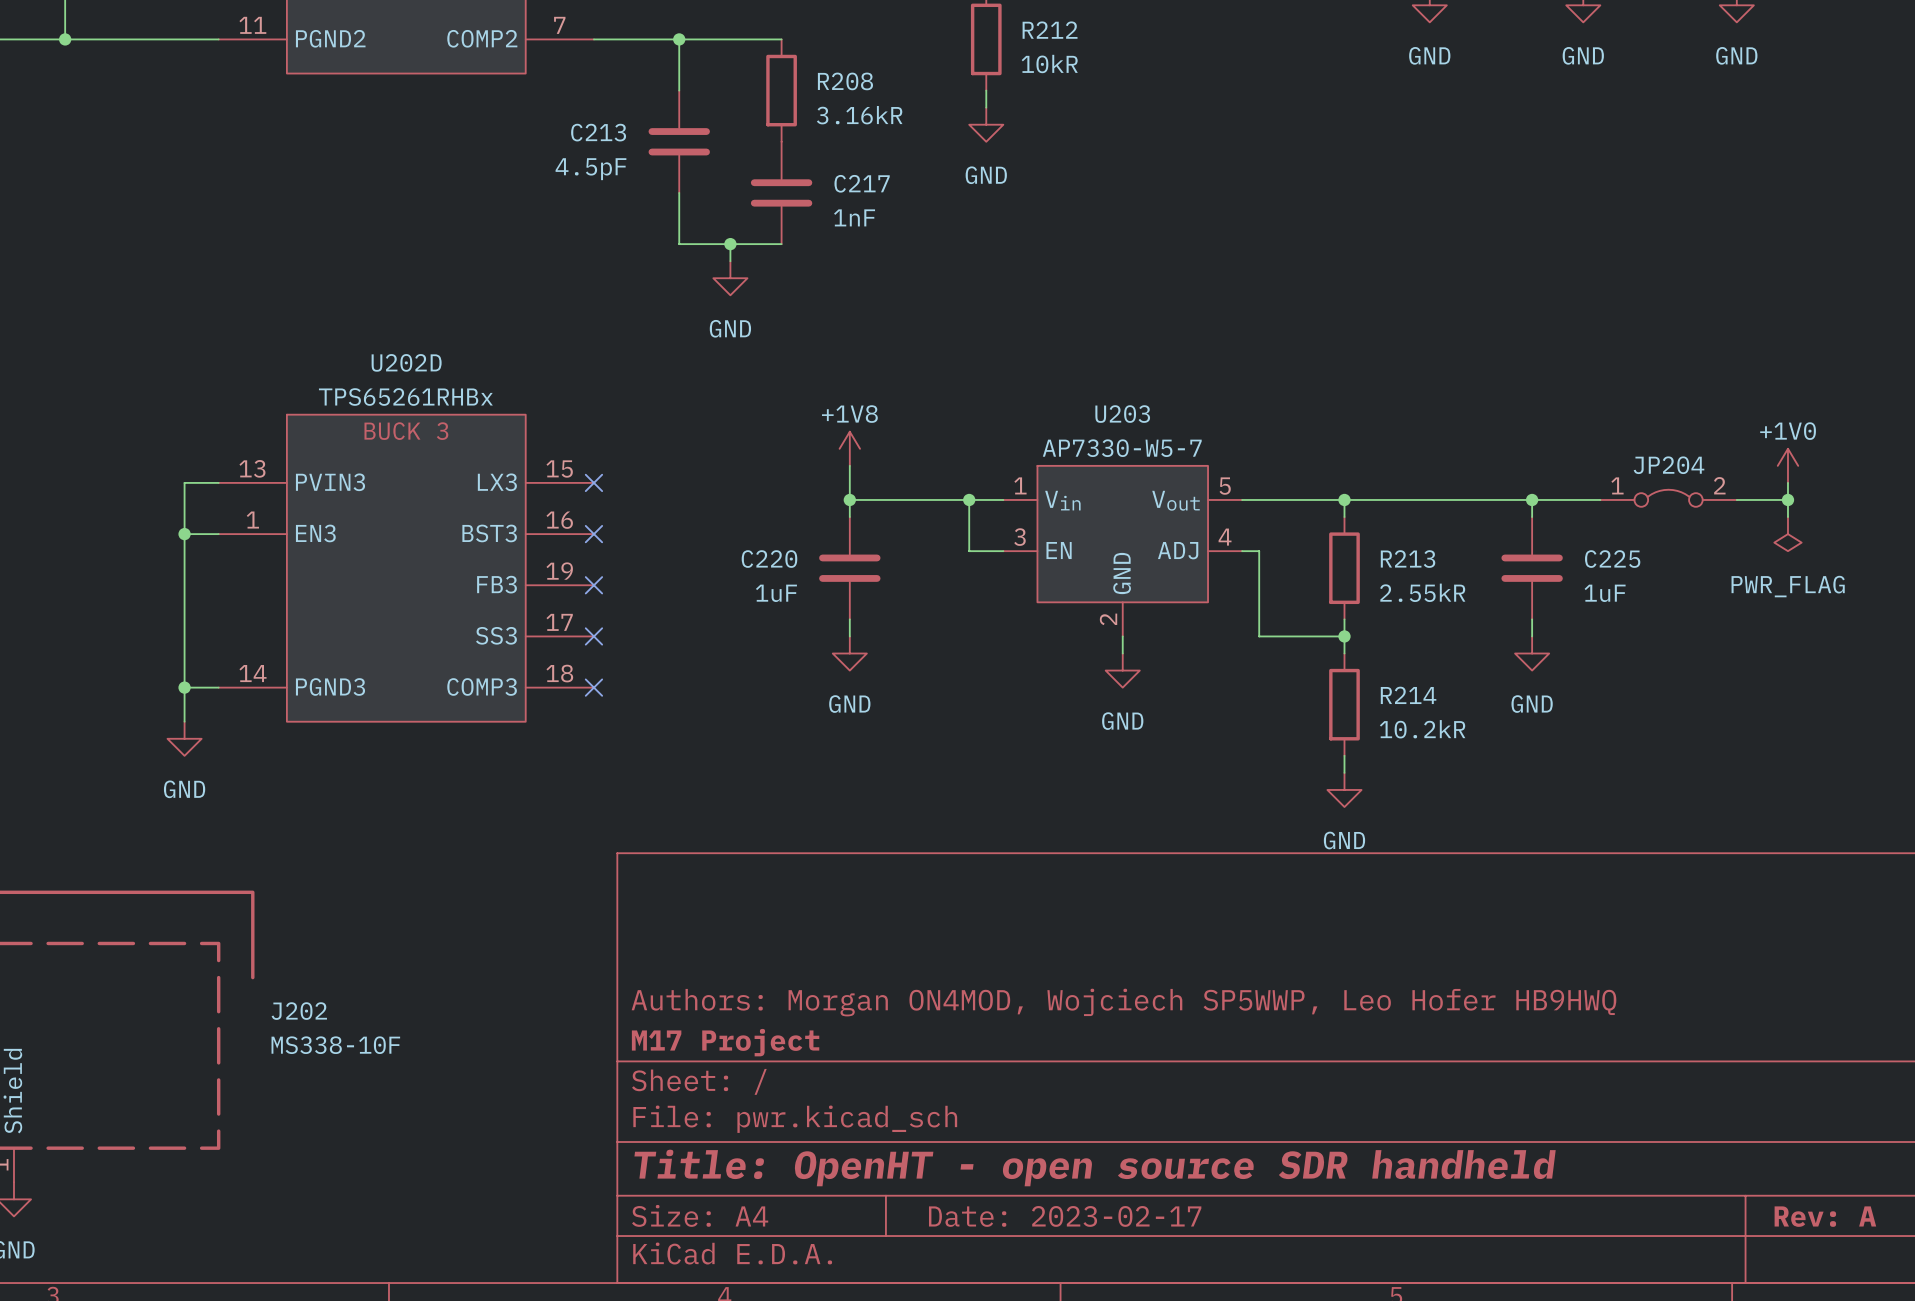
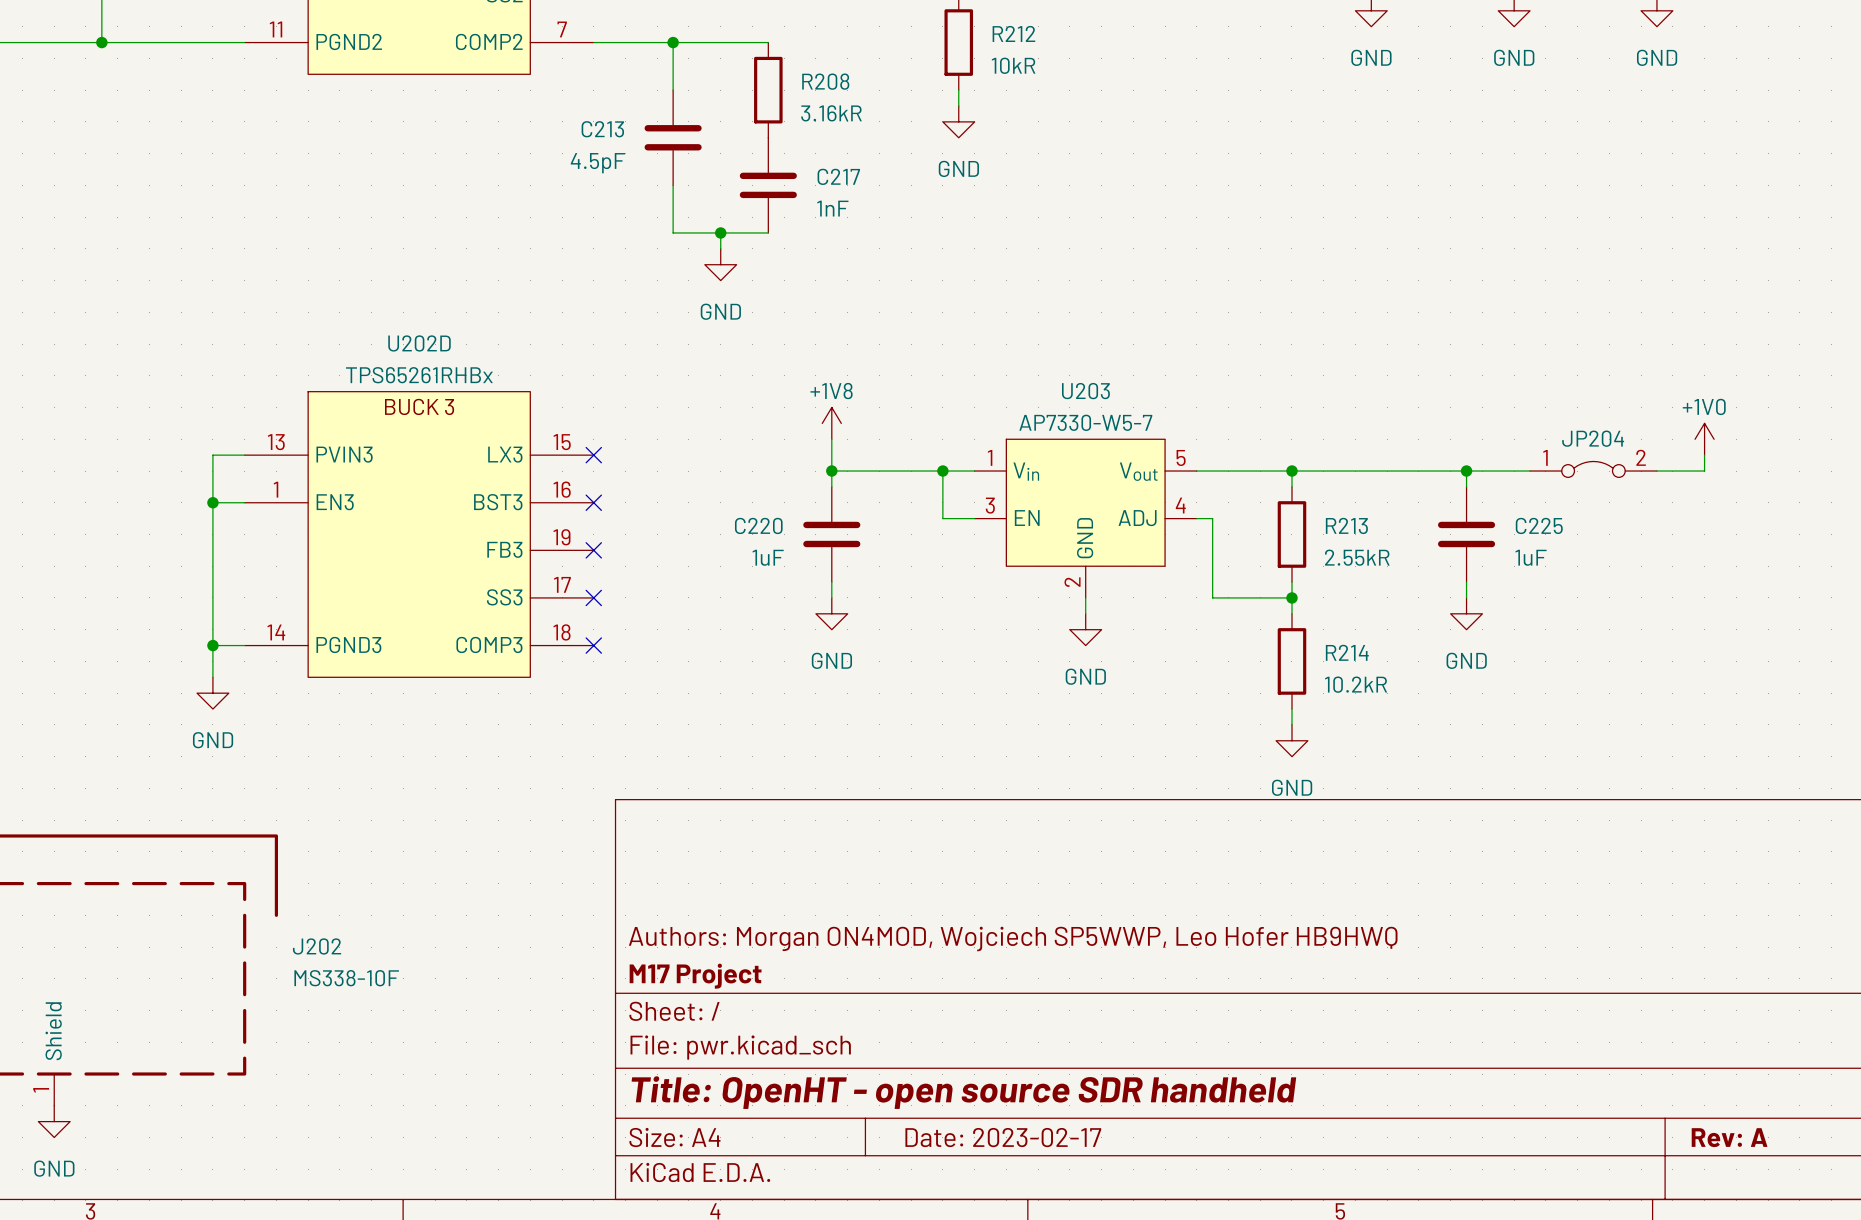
wire: (1787, 499) (1787, 517) -> none
junction: (1787, 499) -> none
power symbol: PWR_FLAG (1787, 534) -> none

